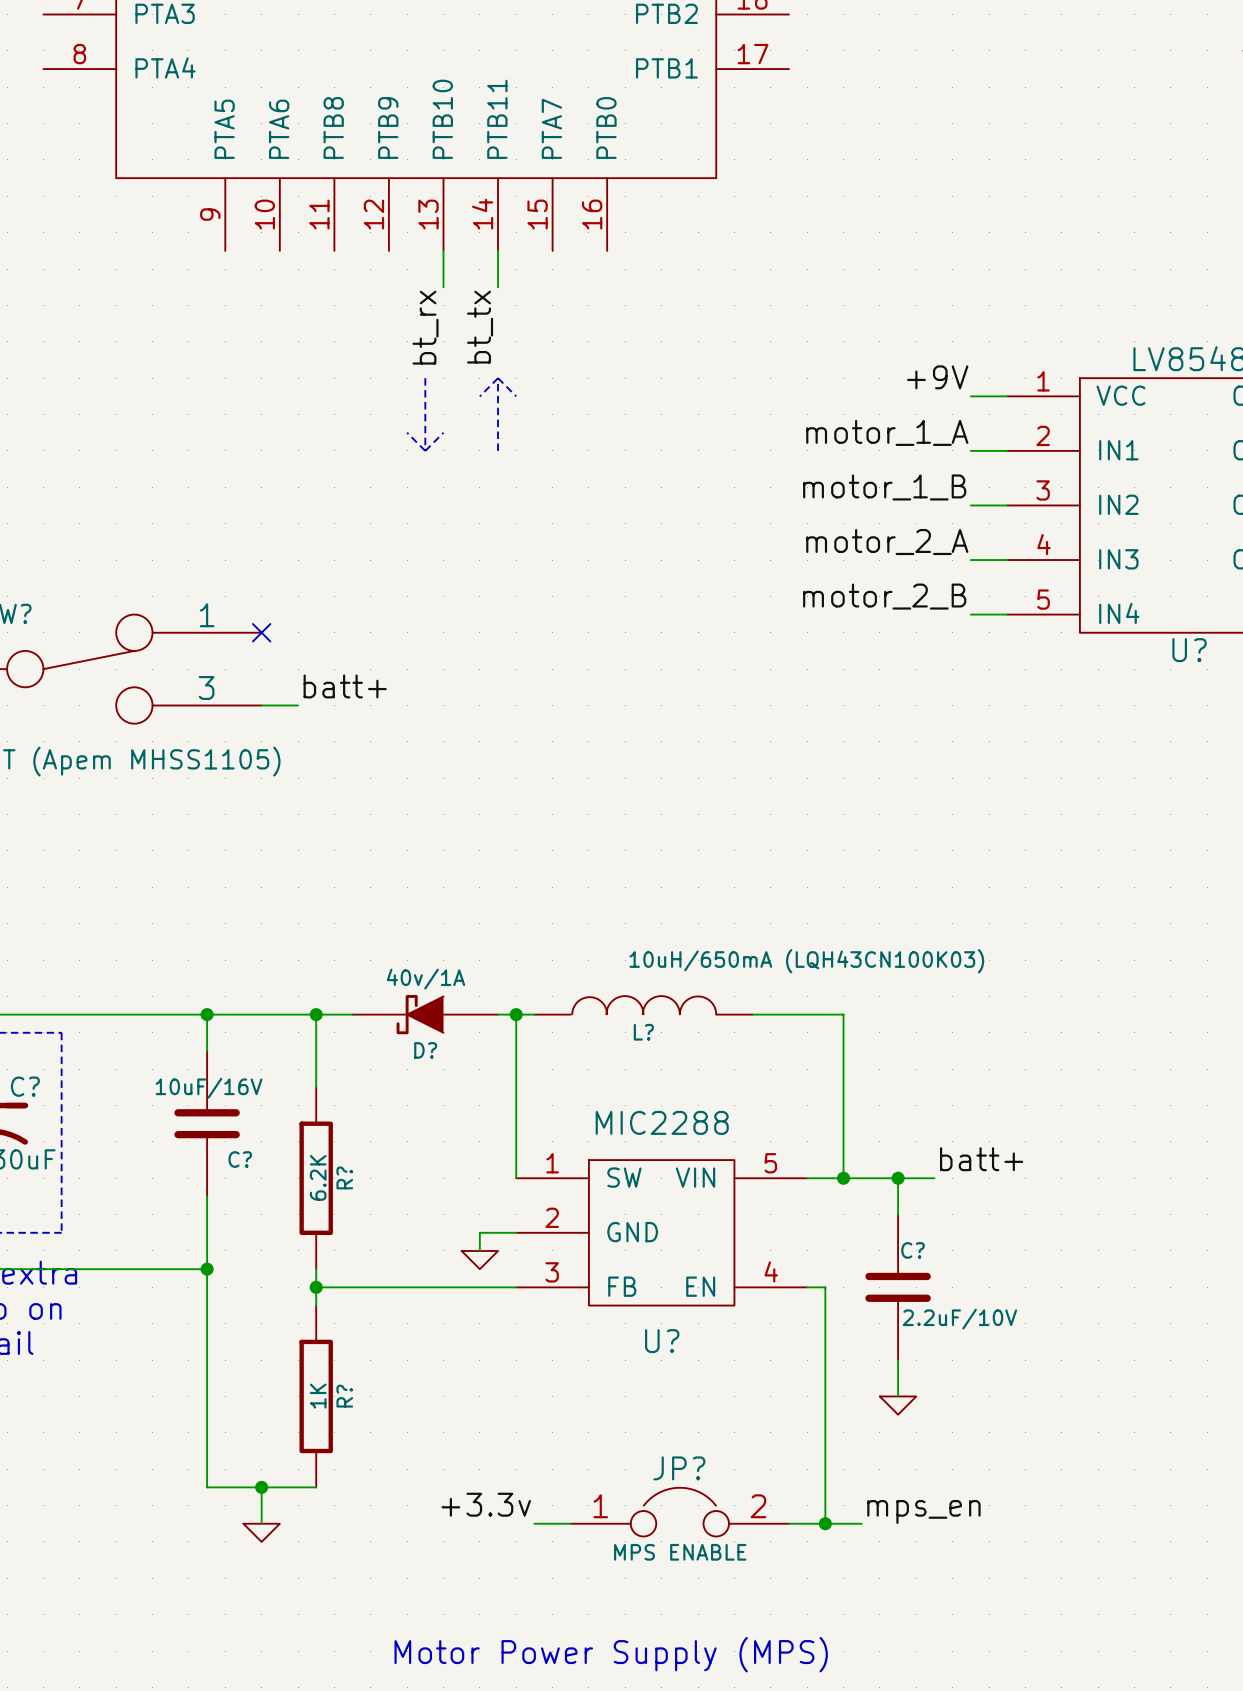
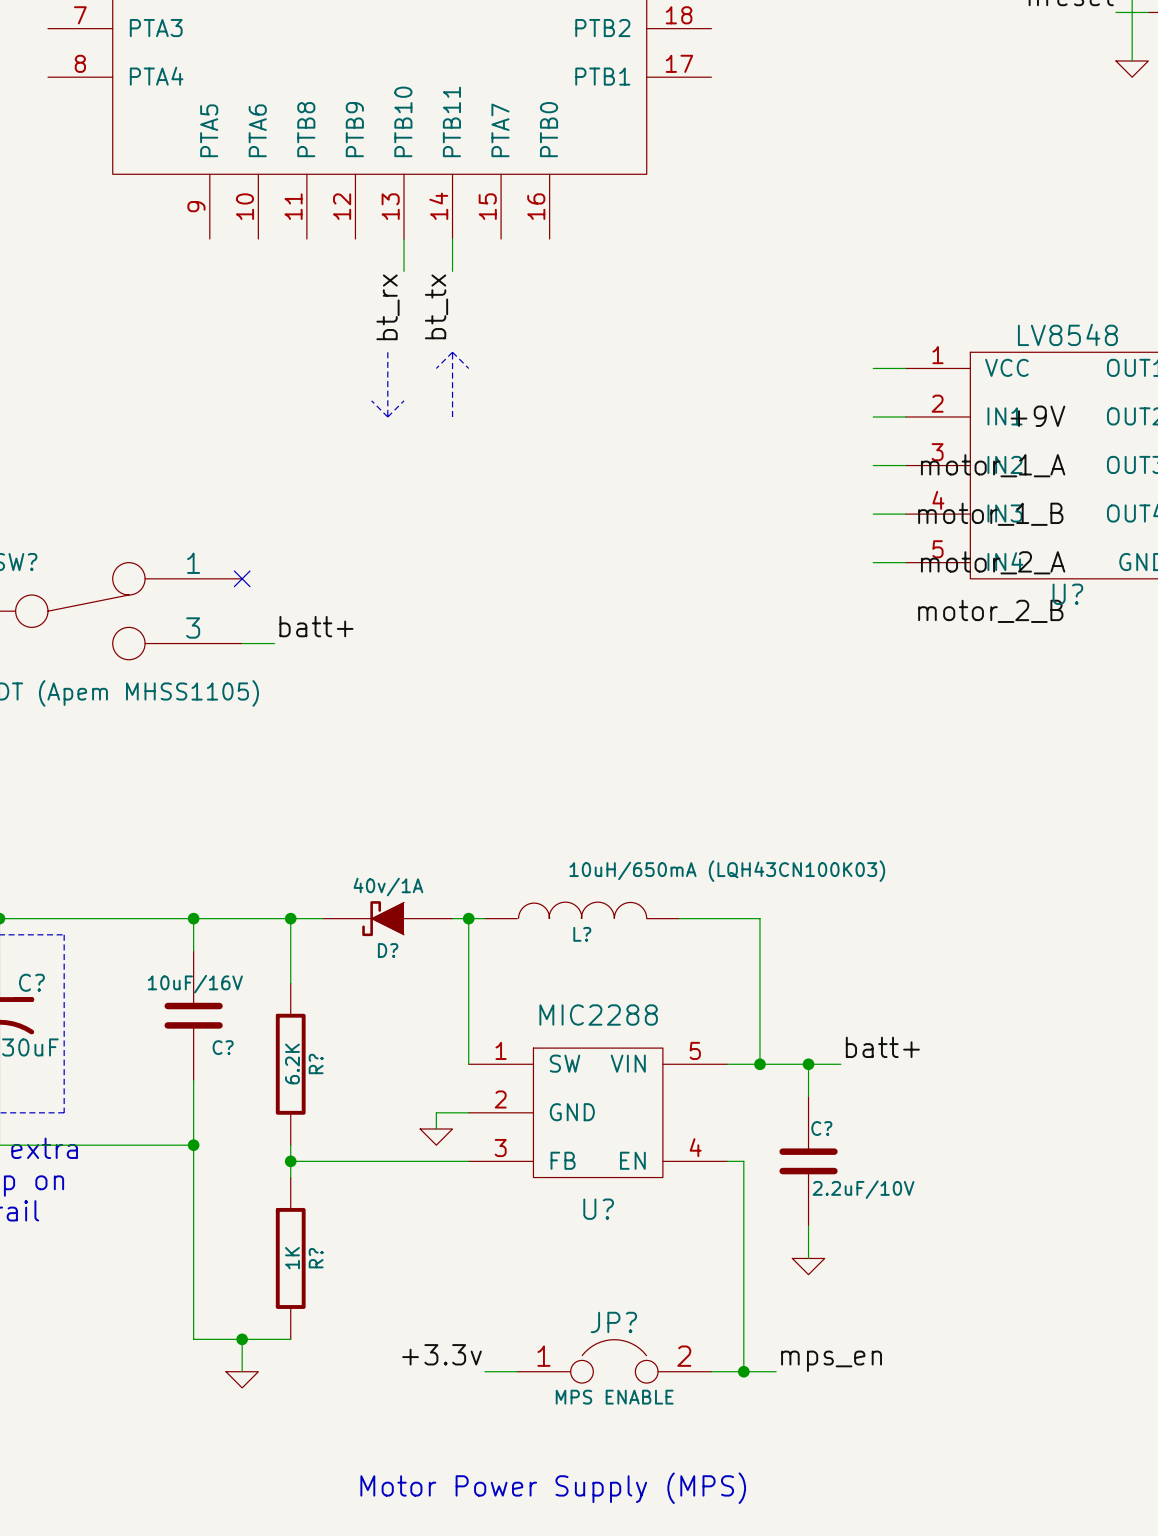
label position: +9V (937, 377) -> +9V (1037, 416)
label position: motor_1_A (887, 432) -> motor_1_A (993, 465)
label position: motor_1_B (884, 487) -> motor_1_B (990, 514)
label position: motor_2_A (887, 542) -> motor_2_A (993, 562)
label position: motor_2_B (884, 596) -> motor_2_B (990, 611)

